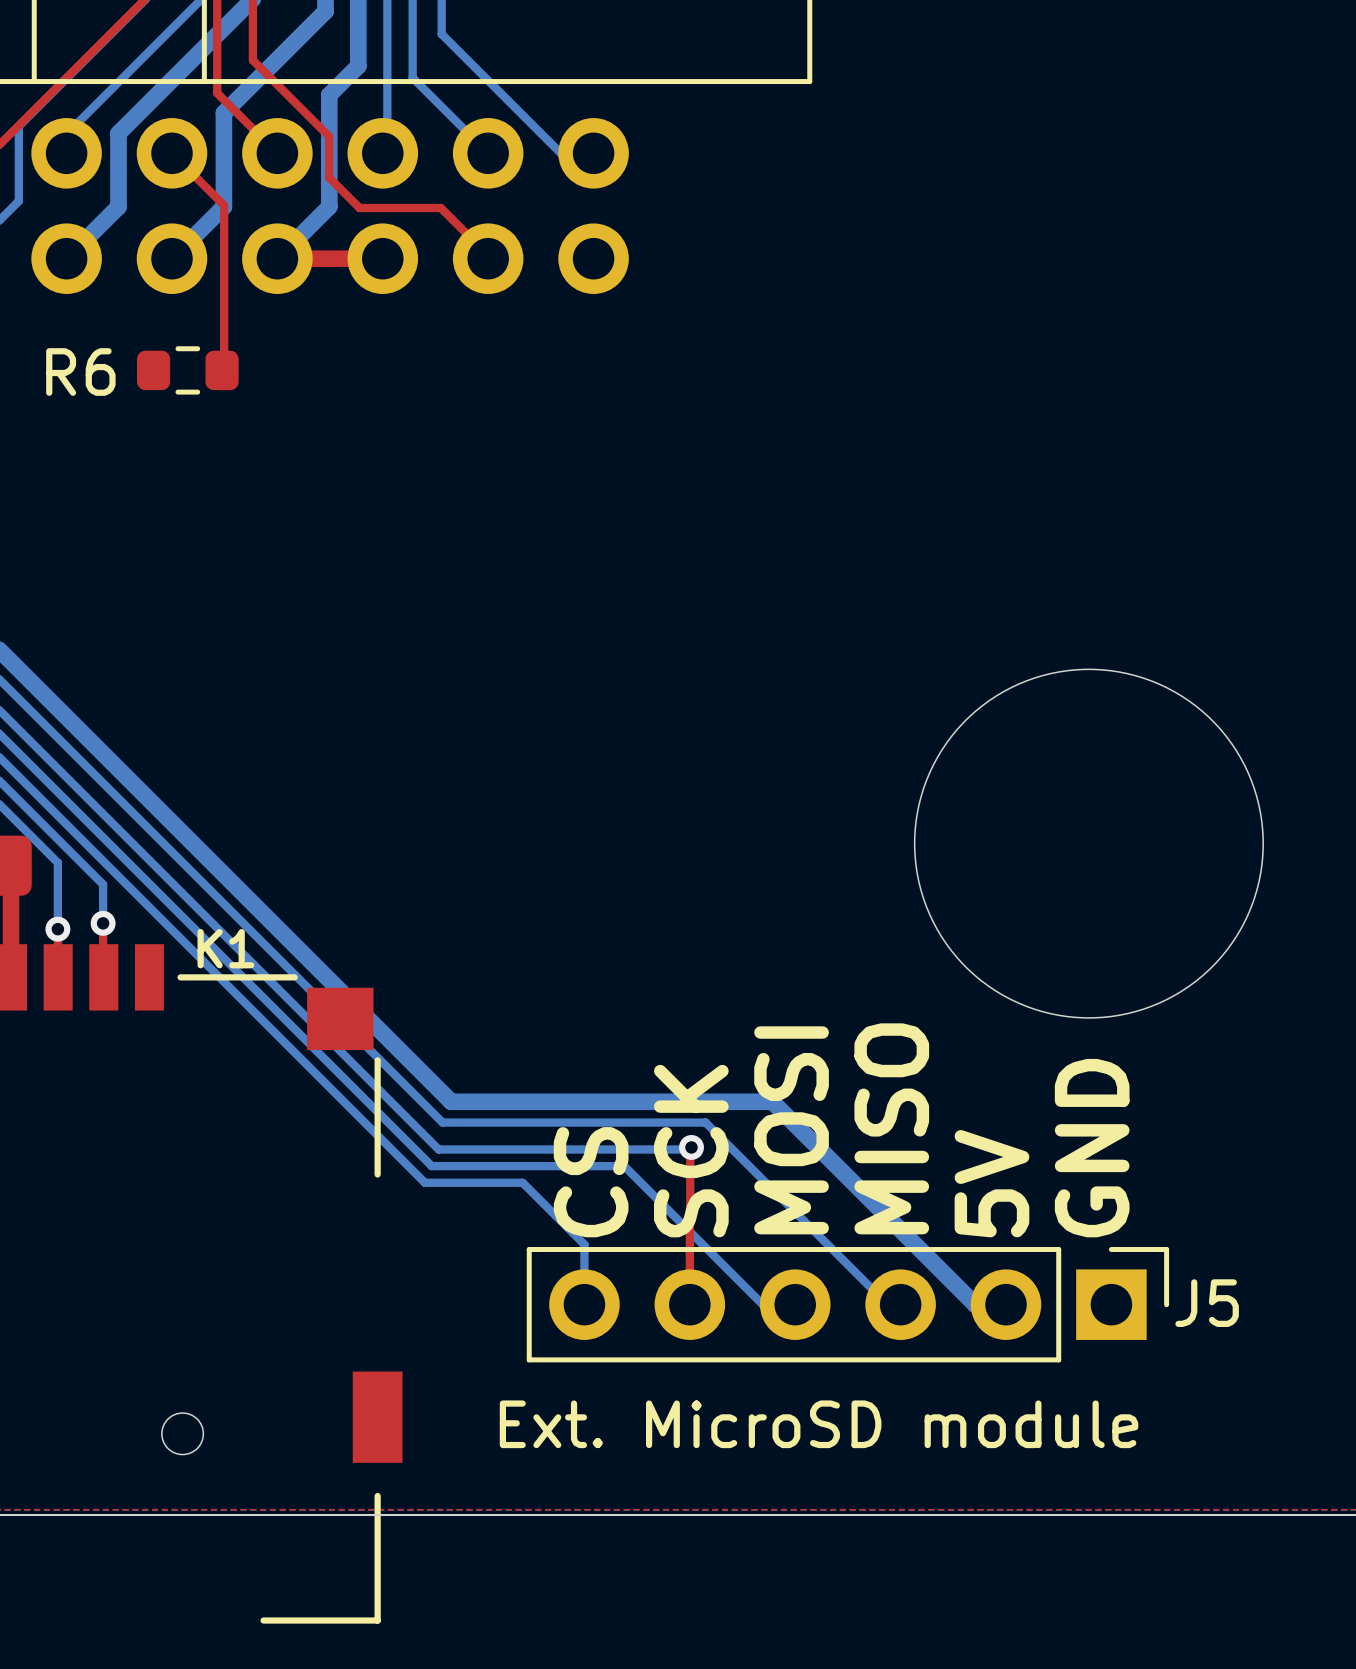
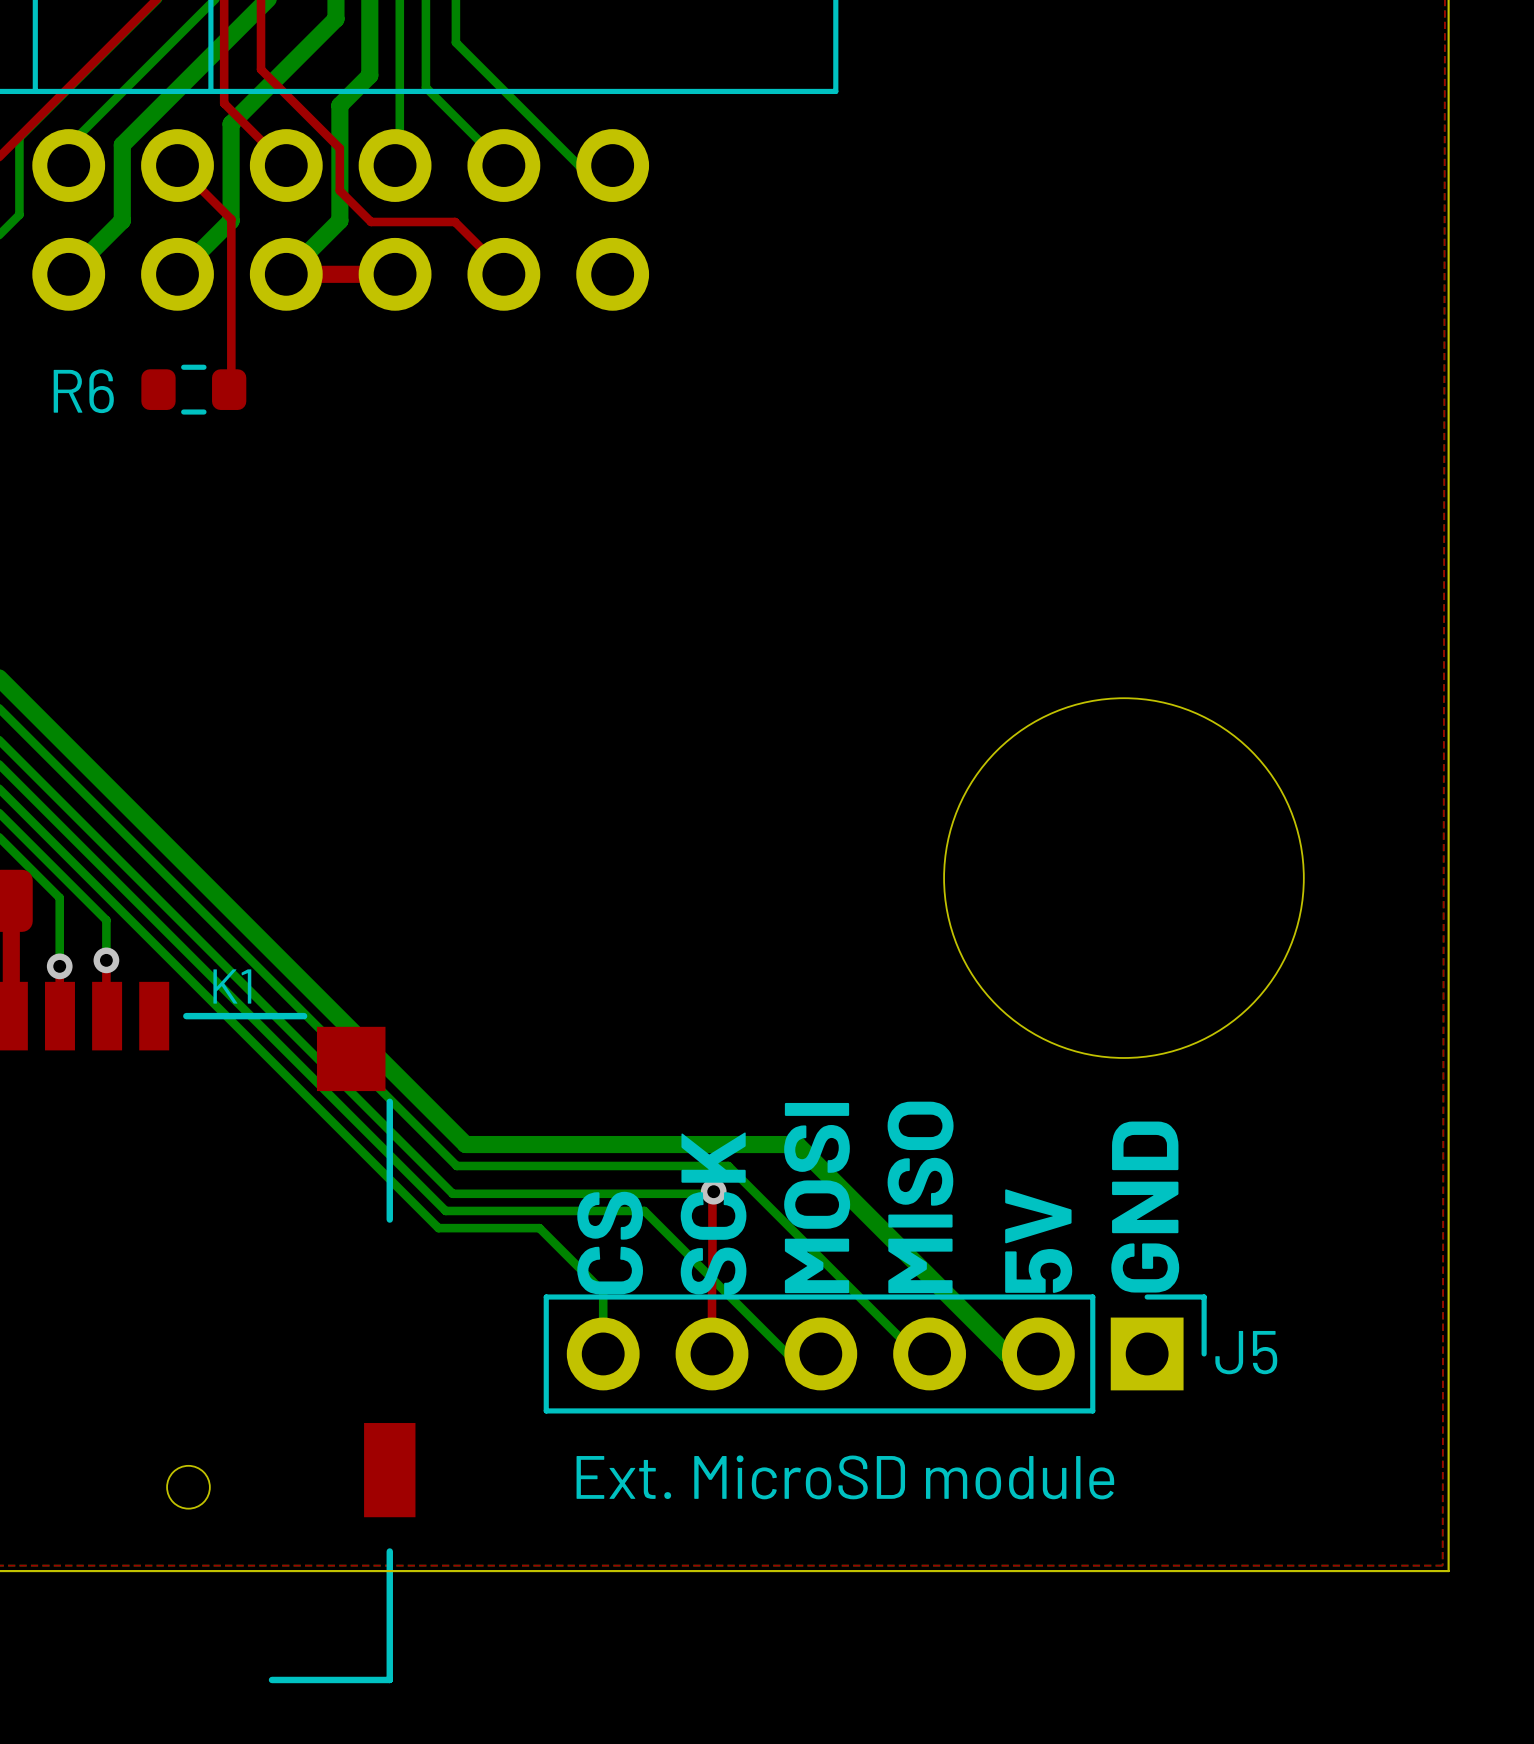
text position: GND (1092, 1148) -> GND (1145, 1207)
text position: 5V (991, 1183) -> 5V (1038, 1241)

